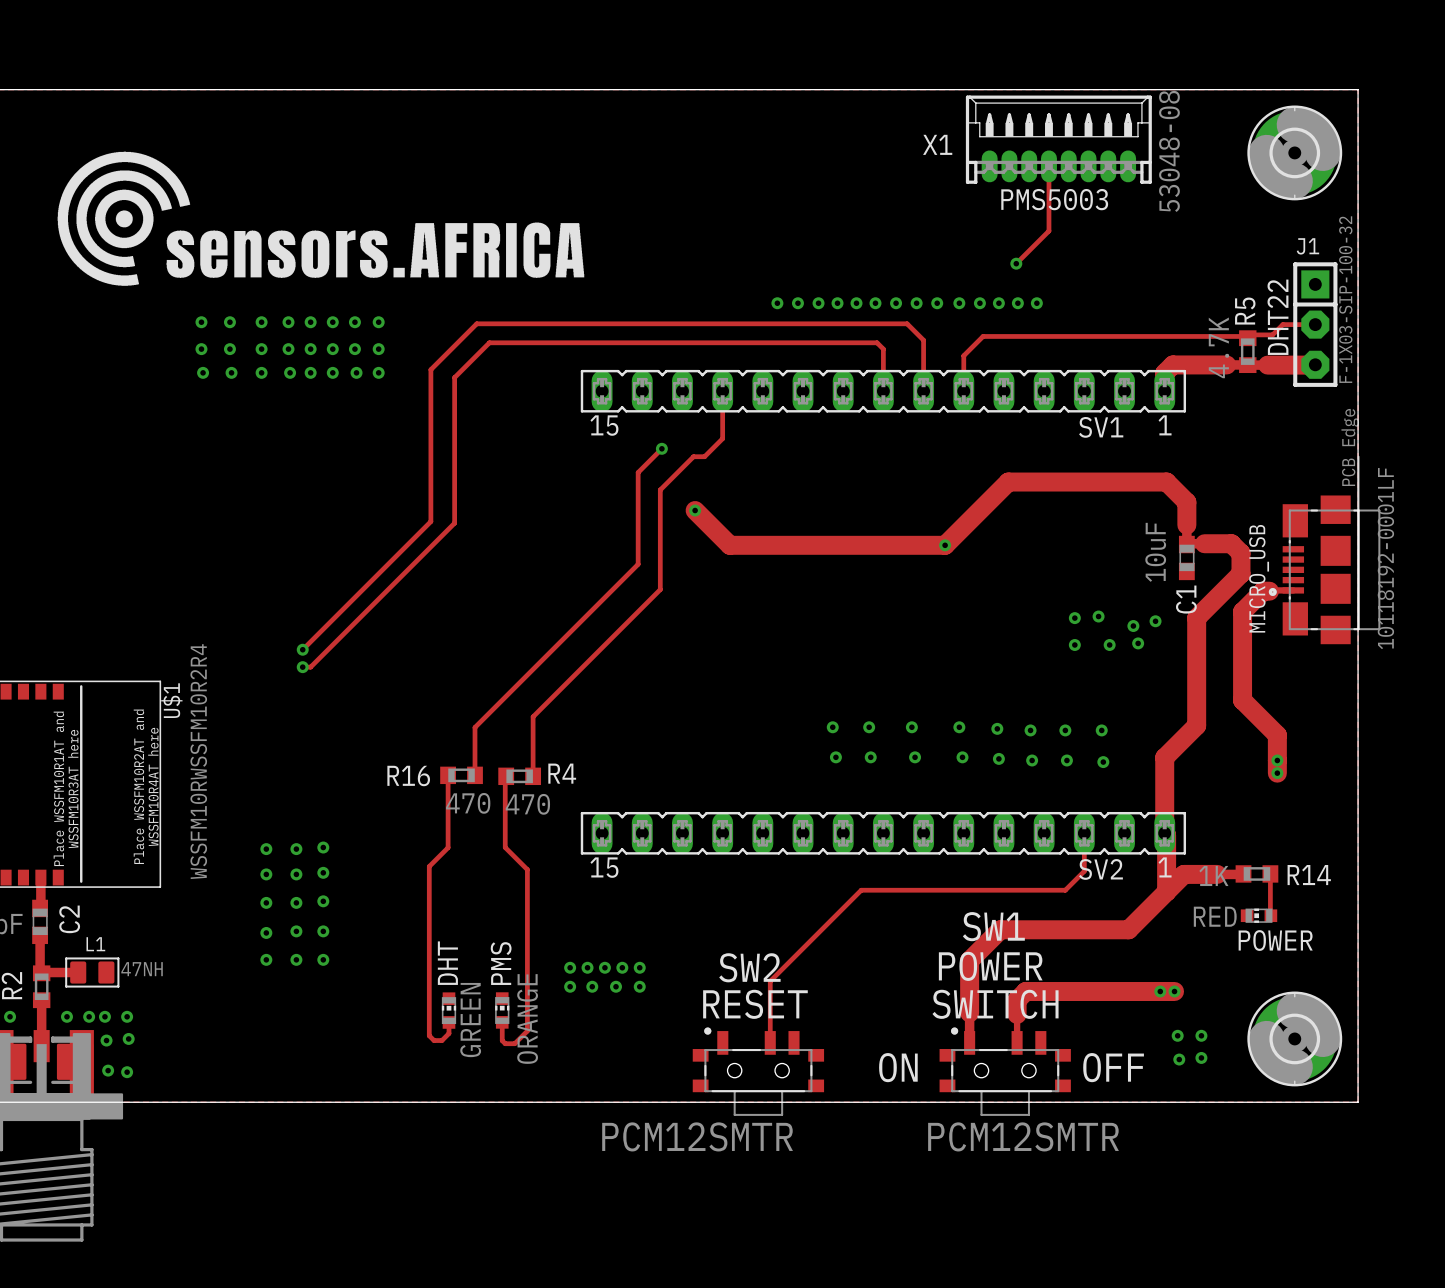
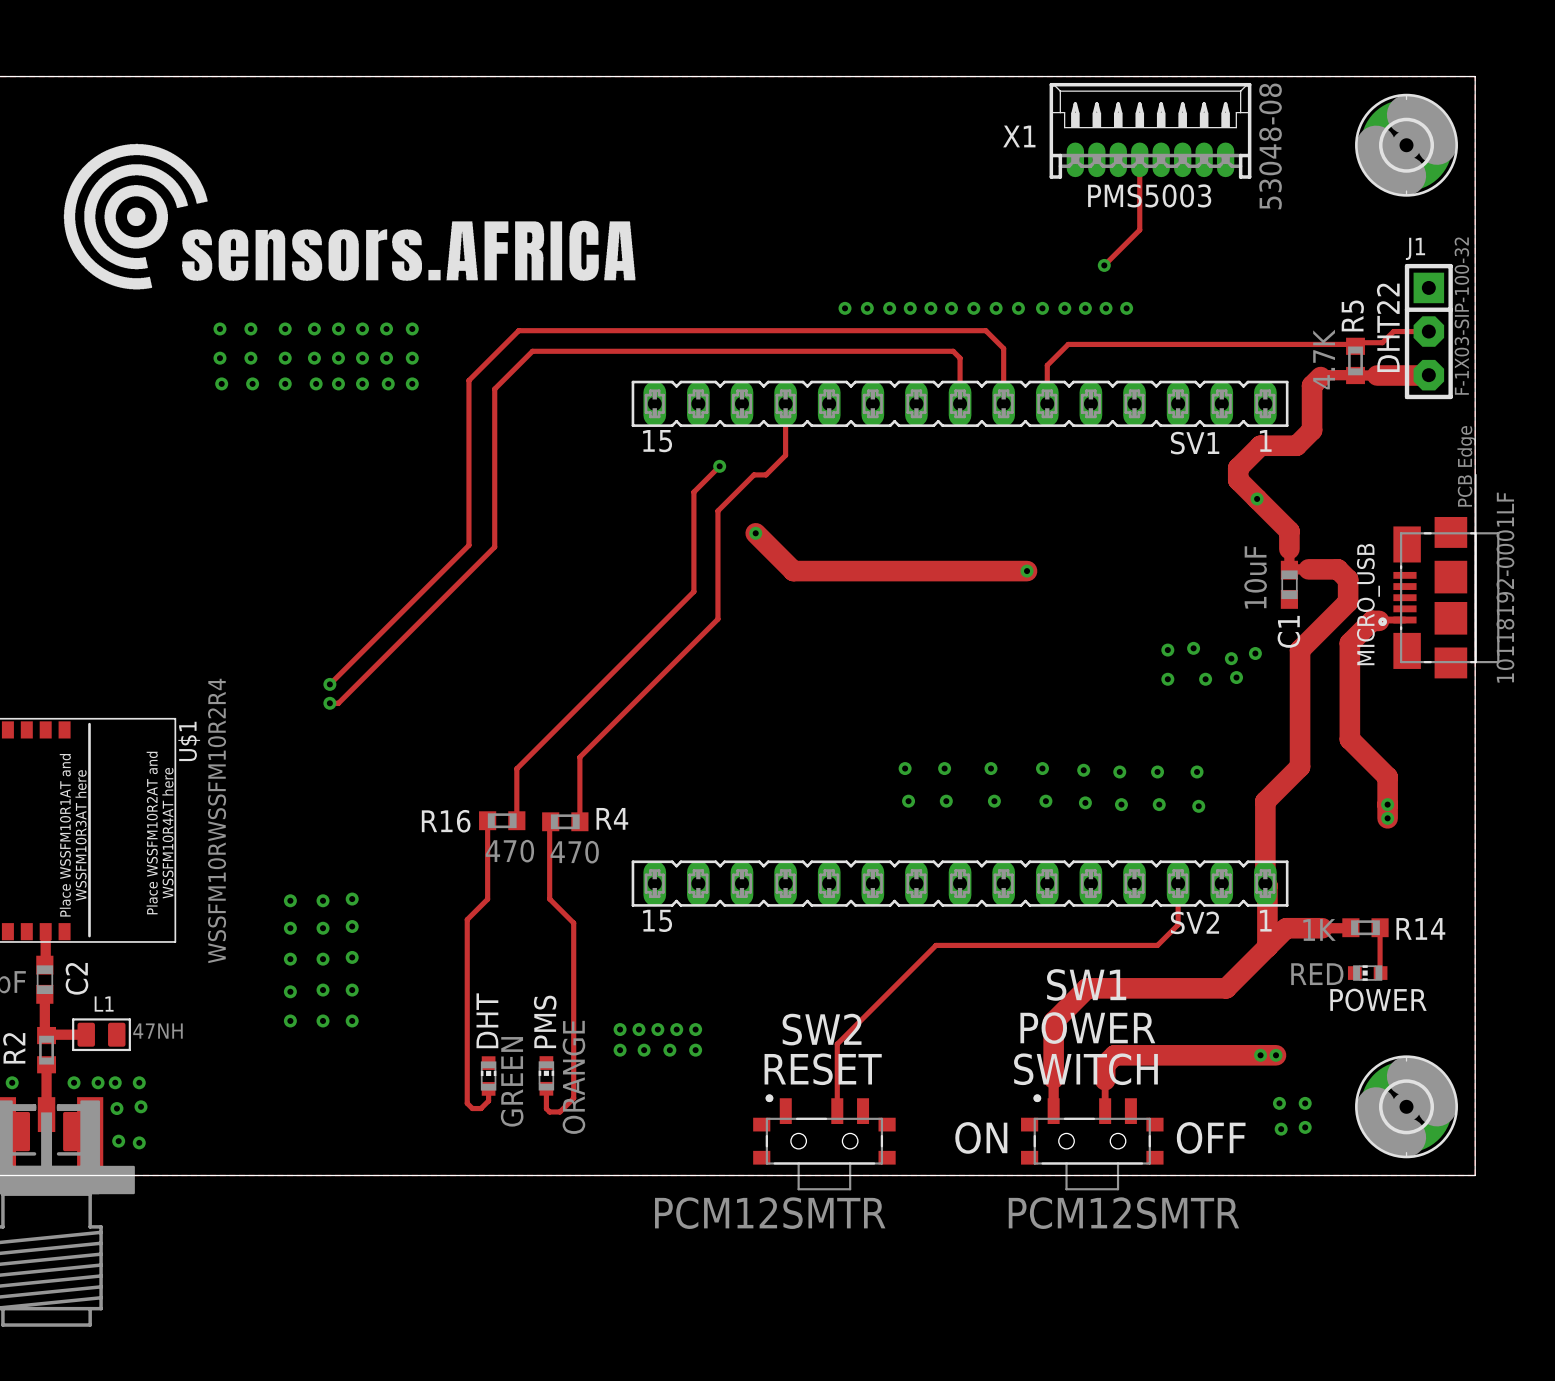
track: (1247, 364) (1172, 364) (1164, 373) (1164, 391) -> (1355, 375) (1322, 375) (1312, 385) (1312, 430) (1296, 445) (1260, 445) (1238, 468) (1238, 480) (1289, 531)
via: none -> (1257, 498)
track: (1186, 508) (1186, 502) (1166, 482) (1008, 482) (945, 545) -> none

